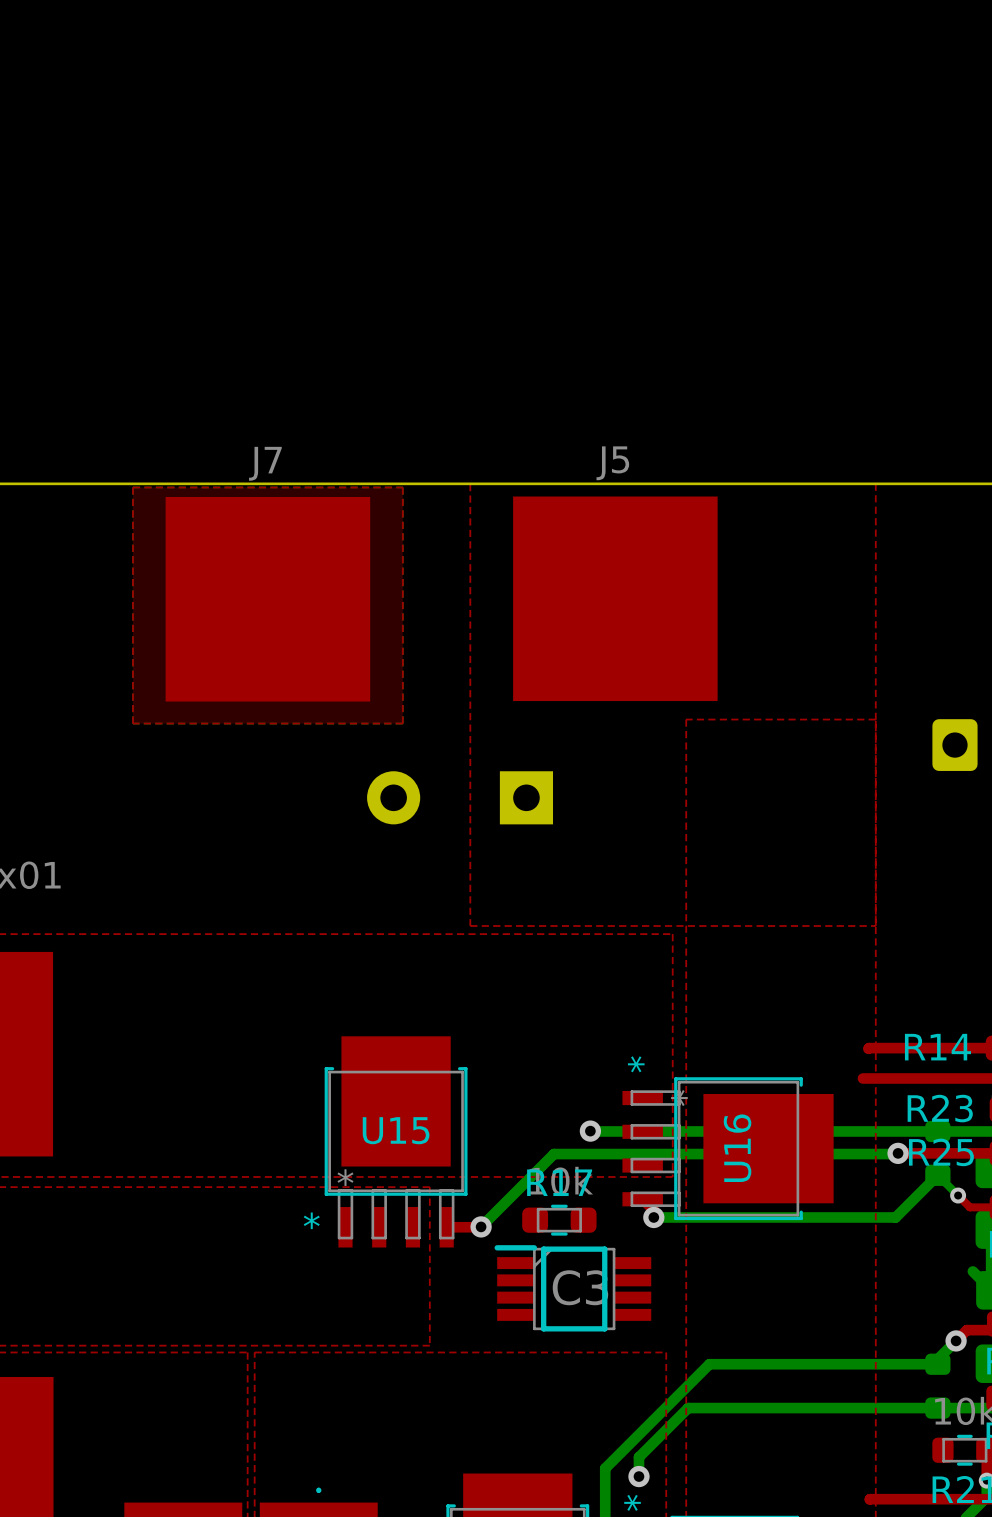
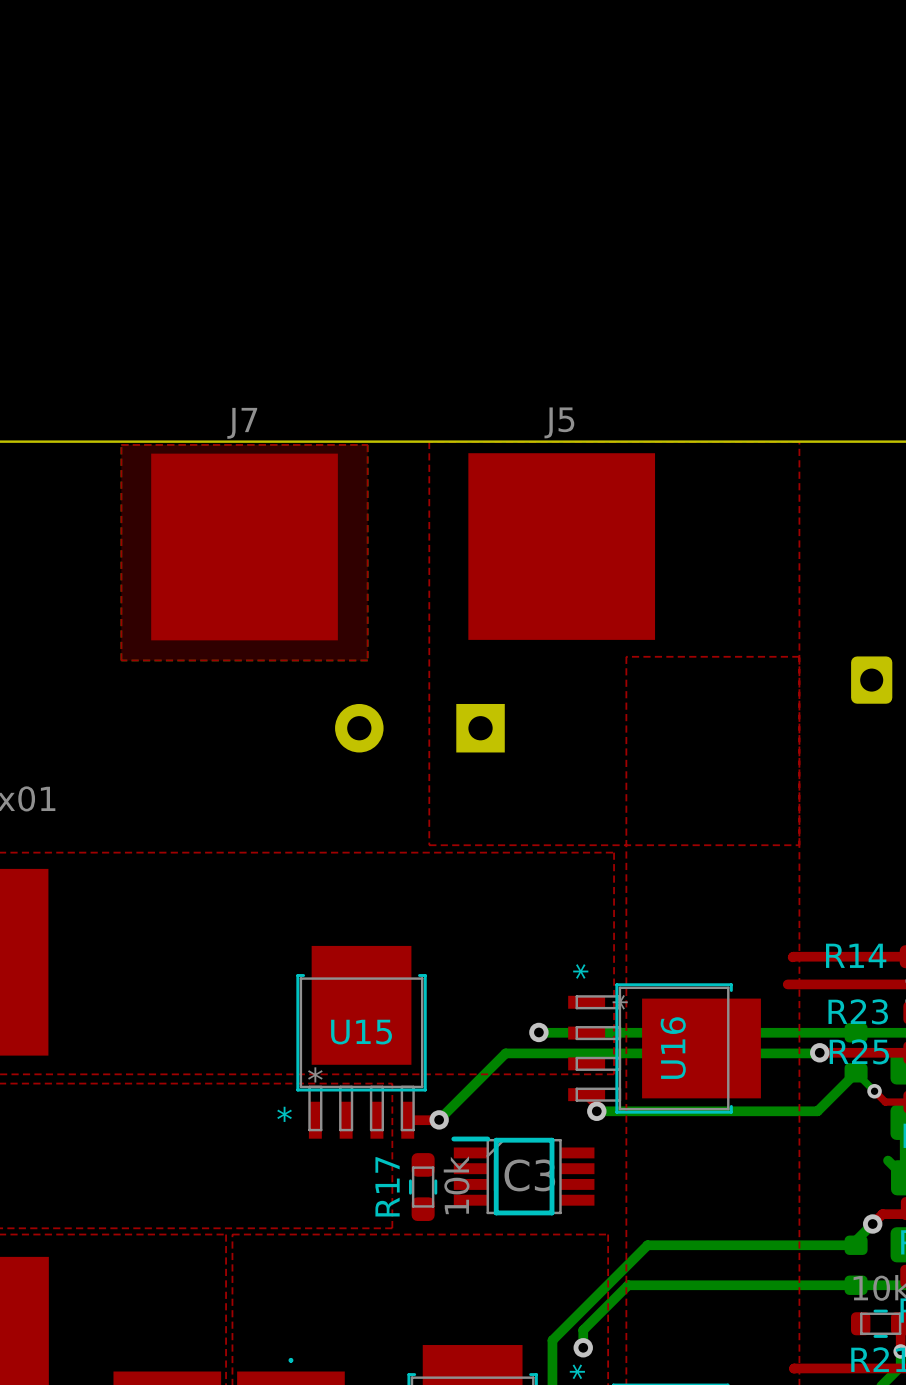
R17 rotation: 0° (559, 1220) -> 90° clockwise (423, 1187)
R17 position: (559, 1220) -> (423, 1187)

